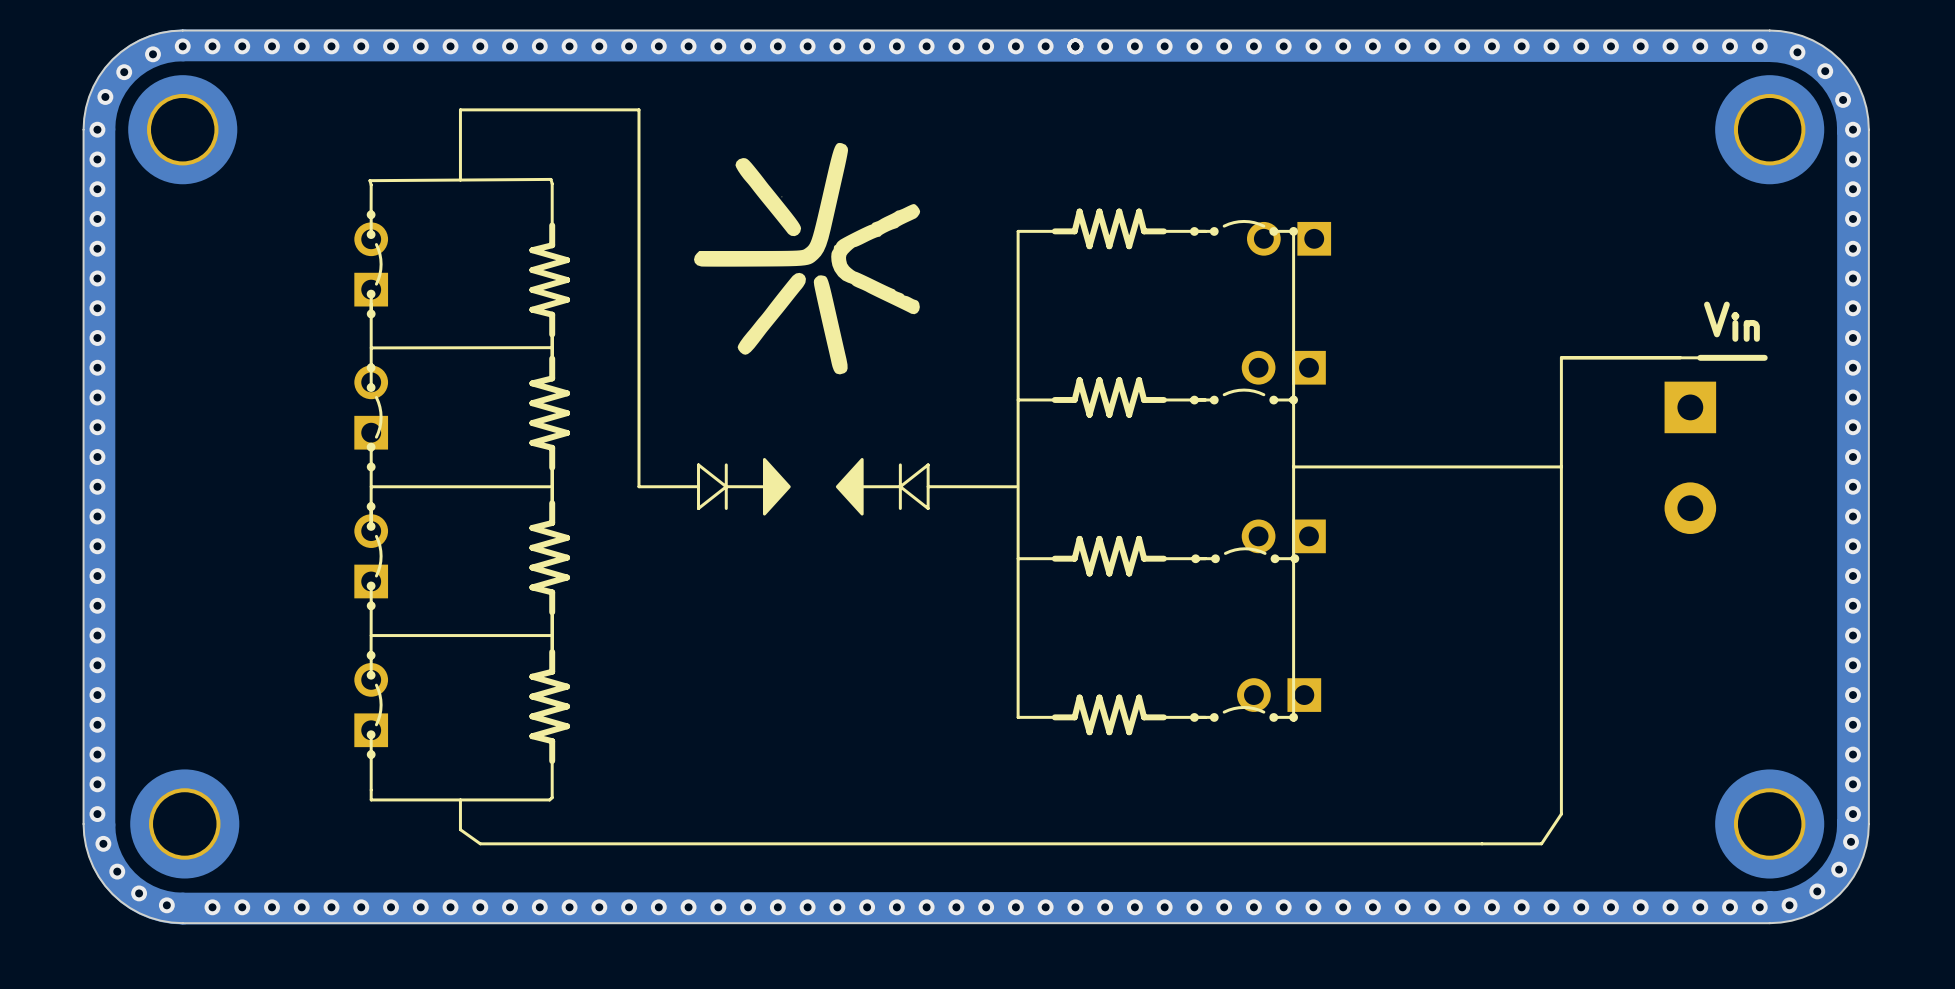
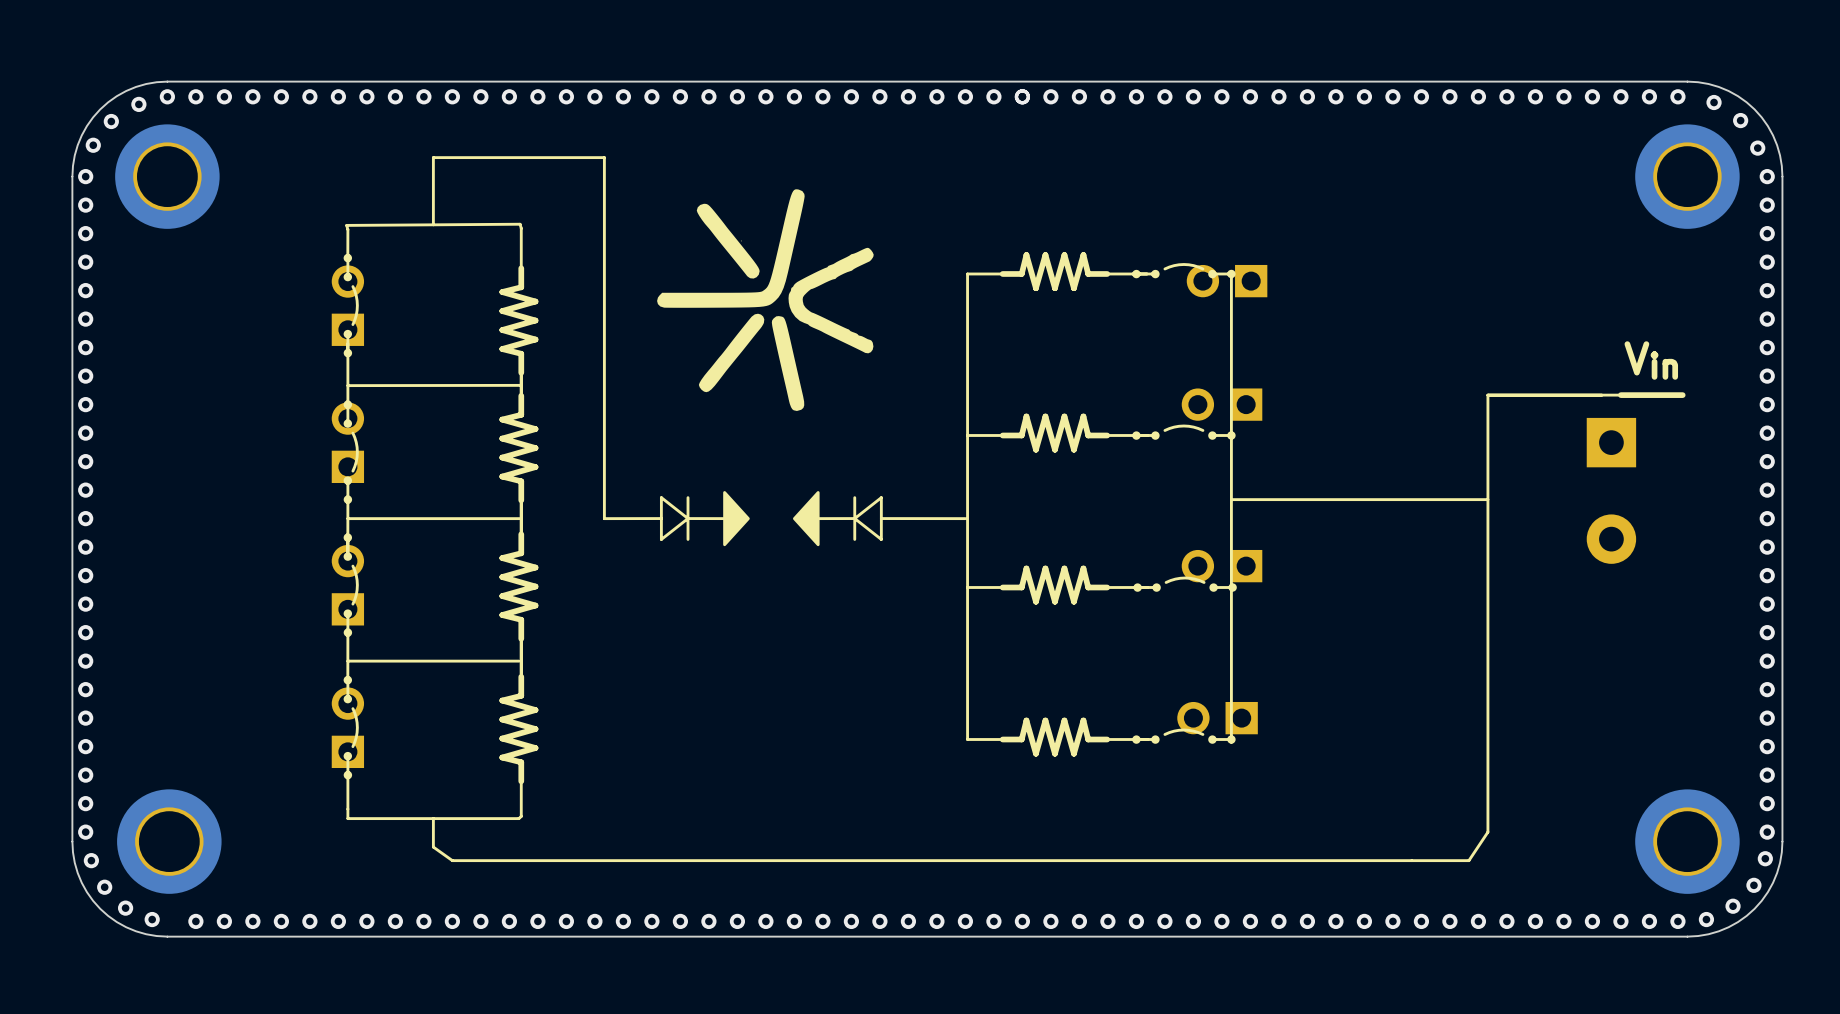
track: (99, 128) (104, 101) (112, 84) (123, 69) (138, 58) (155, 50) (183, 45) (1769, 46) (1788, 48) (1805, 54) (1828, 70) (1840, 85) (1850, 111) (1853, 129) (1853, 823) (1850, 842) (1844, 860) (1834, 876) (1813, 894) (1797, 902) (1769, 907) (182, 908) (164, 906) (146, 900) (123, 884) (112, 869) (104, 852) (99, 834) (99, 129) -> none

